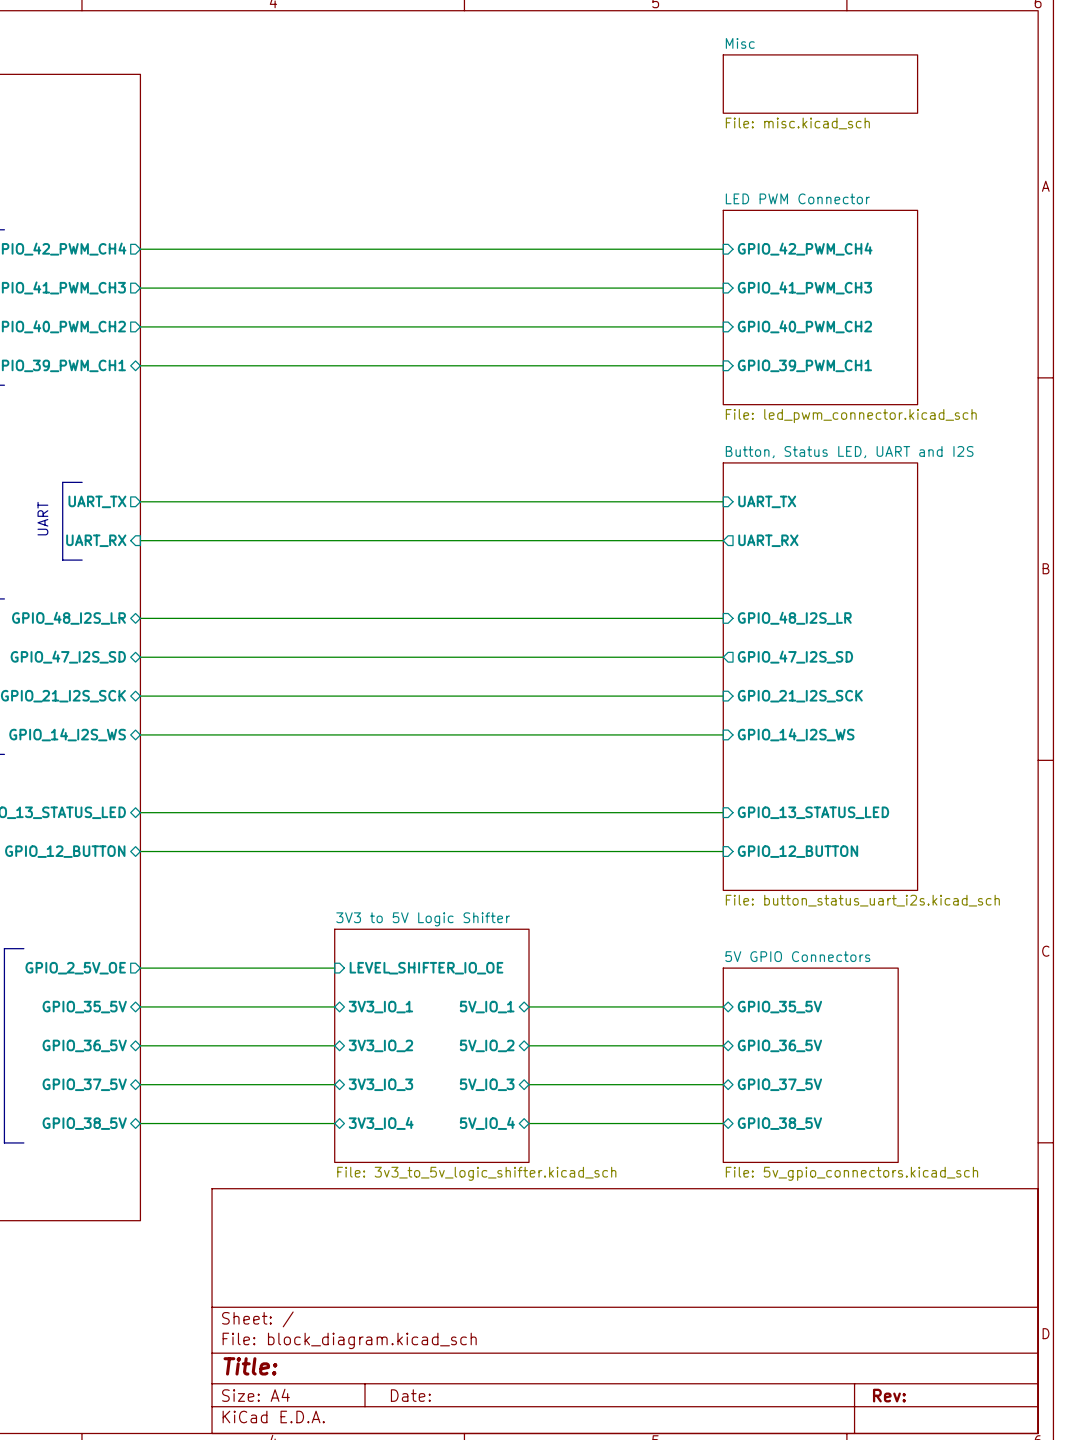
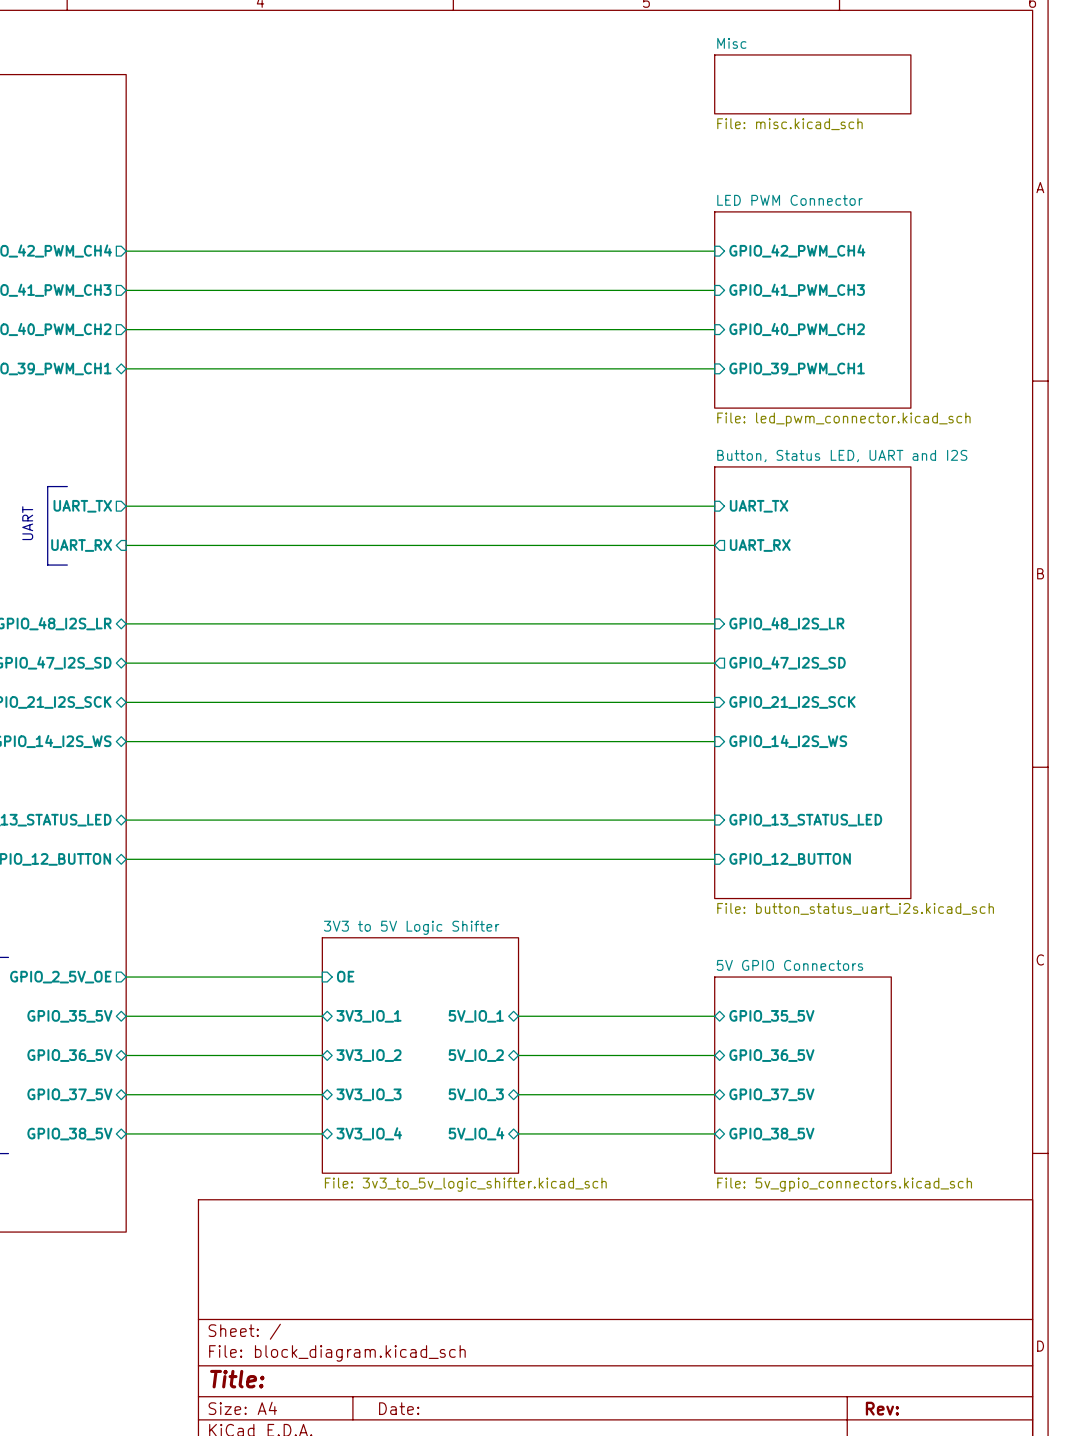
sheet pin: LEVEL_SHIFTER_IO_OE (426, 968) -> OE (345, 976)

